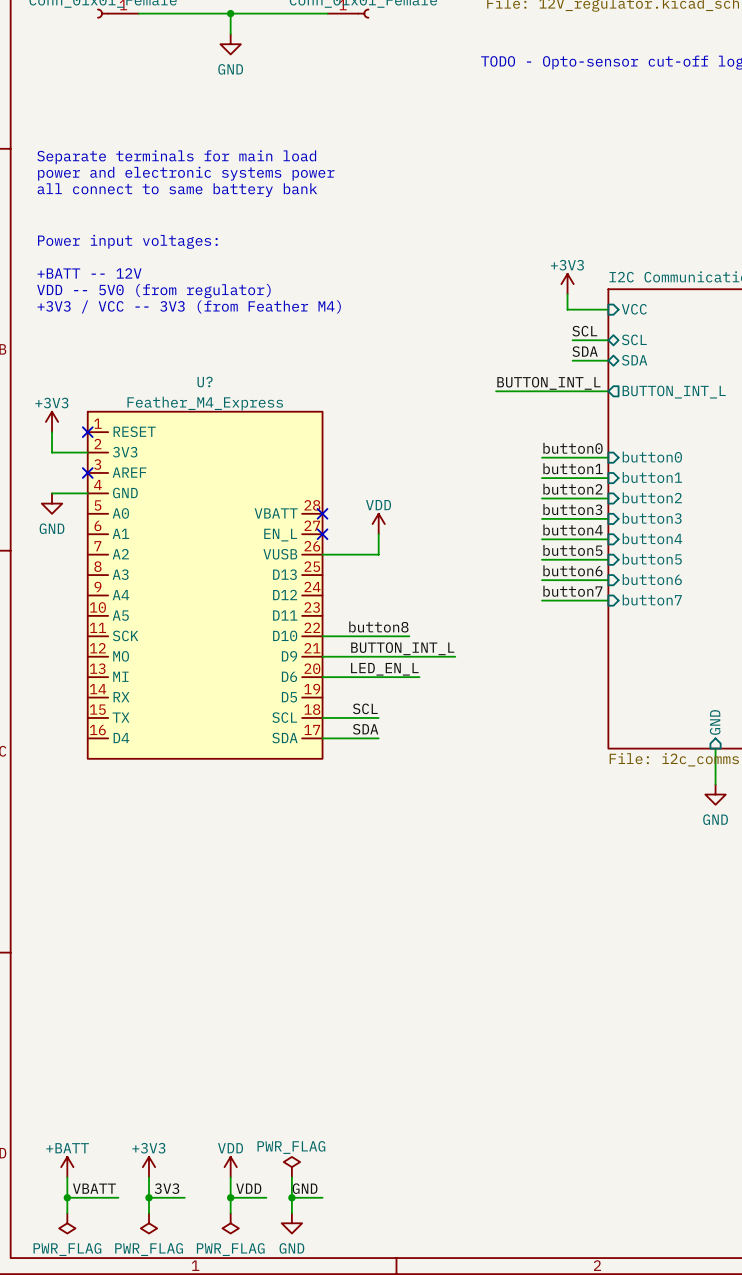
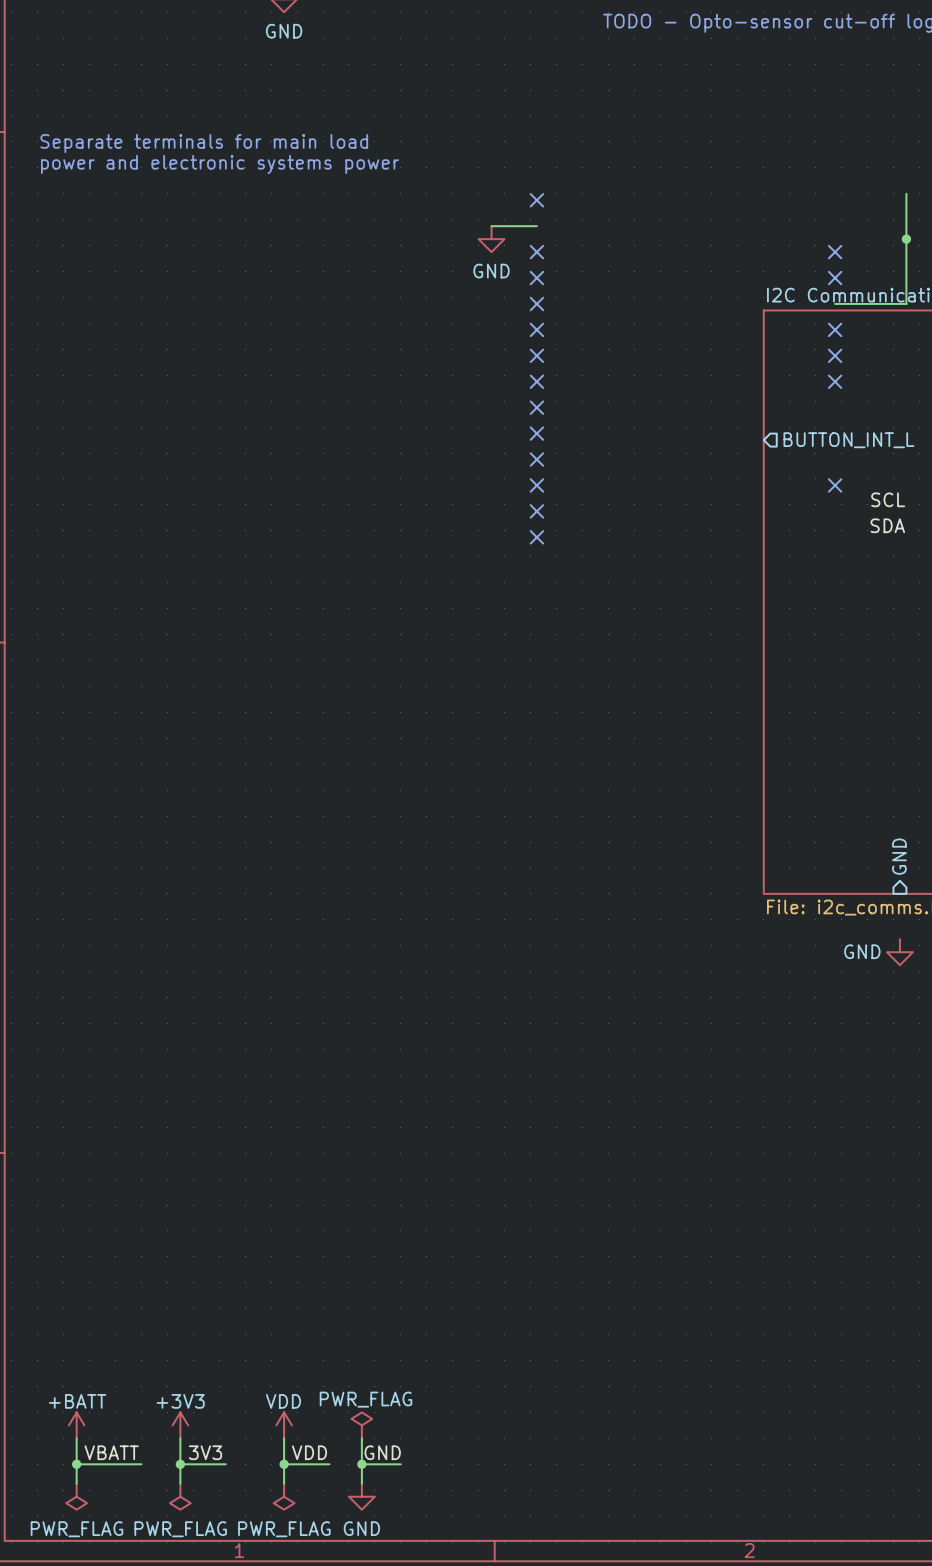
text: all connect to same battery bank (177, 190) -> none
wire: none -> (906, 193) (906, 303) (835, 303)
no-connect mark: none -> (536, 200)
wire: none -> (491, 226) (536, 226)
power symbol: none -> GND (491, 239)
junction: none -> (906, 239)
text: Power input voltages: (127, 241) -> none
no-connect mark: none -> (536, 252)
no-connect mark: none -> (835, 252)
no-connect mark: none -> (536, 278)
no-connect mark: none -> (835, 278)
text: +BATT -- 12V (89, 273) -> none
no-connect mark: none -> (536, 303)
power symbol: +3V3 (567, 284) -> none
text: VDD -- 5V0 (from regulator) (153, 291) -> none
wire: (567, 294) (567, 309) (608, 309) -> none
no-connect mark: none -> (536, 329)
no-connect mark: none -> (835, 329)
text: +3V3 / VCC -- 3V3 (from Feather M4) (189, 306) -> none
sheet pin: VCC (634, 309) -> none
no-connect mark: none -> (536, 355)
no-connect mark: none -> (835, 355)
label position: SCL (584, 331) -> SCL (888, 499)
sheet pin: SCL (634, 339) -> none
wire: (572, 340) (608, 340) -> none
no-connect mark: none -> (536, 381)
no-connect mark: none -> (835, 381)
label position: SDA (585, 351) -> SDA (887, 525)
wire: (572, 360) (608, 360) -> none
sheet pin: SDA (634, 360) -> none
no-connect mark: none -> (536, 407)
label: BUTTON_INT_L (548, 383) -> none
no-connect mark: none -> (536, 433)
wire: (496, 391) (608, 391) -> none
no-connect mark: none -> (536, 459)
power symbol: +3V3 (52, 421) -> none
no-connect mark: none -> (536, 485)
no-connect mark: none -> (835, 485)
wire: (52, 432) (52, 452) (87, 452) -> none
no-connect mark: (87, 432) -> none
no-connect mark: none -> (536, 511)
label: button0 (573, 448) -> none
wire: (542, 457) (608, 457) -> none
sheet pin: button0 (652, 457) -> none
no-connect mark: none -> (536, 537)
label: button1 (573, 468) -> none
no-connect mark: (87, 472) -> none
sheet pin: button1 (652, 477) -> none
wire: (542, 478) (608, 478) -> none
label: button2 (572, 489) -> none
wire: (52, 493) (87, 493) -> none
sheet pin: button2 (652, 497) -> none
wire: (542, 498) (608, 498) -> none
power symbol: GND (52, 503) -> none
label: button3 (572, 509) -> none
no-connect mark: (322, 513) -> none
wire: (542, 518) (608, 518) -> none
sheet pin: button3 (652, 518) -> none
power symbol: VDD (378, 524) -> none
label: button4 (573, 530) -> none
no-connect mark: (322, 534) -> none
wire: (378, 534) (378, 554) (322, 554) -> none
sheet pin: button4 (652, 538) -> none
wire: (542, 539) (608, 539) -> none
label: button5 (572, 550) -> none
wire: (542, 559) (608, 559) -> none
sheet pin: button5 (652, 559) -> none
label: button6 (572, 570) -> none
sheet pin: button6 (652, 579) -> none
wire: (542, 580) (608, 580) -> none
U?: Feather_M4_Express (205, 585) -> none
label: button7 (572, 591) -> none
sheet pin: button7 (652, 599) -> none
wire: (542, 600) (608, 600) -> none
label: button8 (378, 626) -> none
wire: (322, 636) (409, 636) -> none
label: BUTTON_INT_L (402, 648) -> none
wire: (322, 656) (455, 656) -> none
label: LED_EN_L (384, 669) -> none
wire: (322, 677) (419, 677) -> none
label: SCL (365, 708) -> none
wire: (322, 717) (378, 717) -> none
label: SDA (365, 729) -> none
wire: (322, 738) (378, 738) -> none
wire: (715, 748) (715, 784) -> none
power symbol text position: GND (715, 819) -> GND (862, 951)

